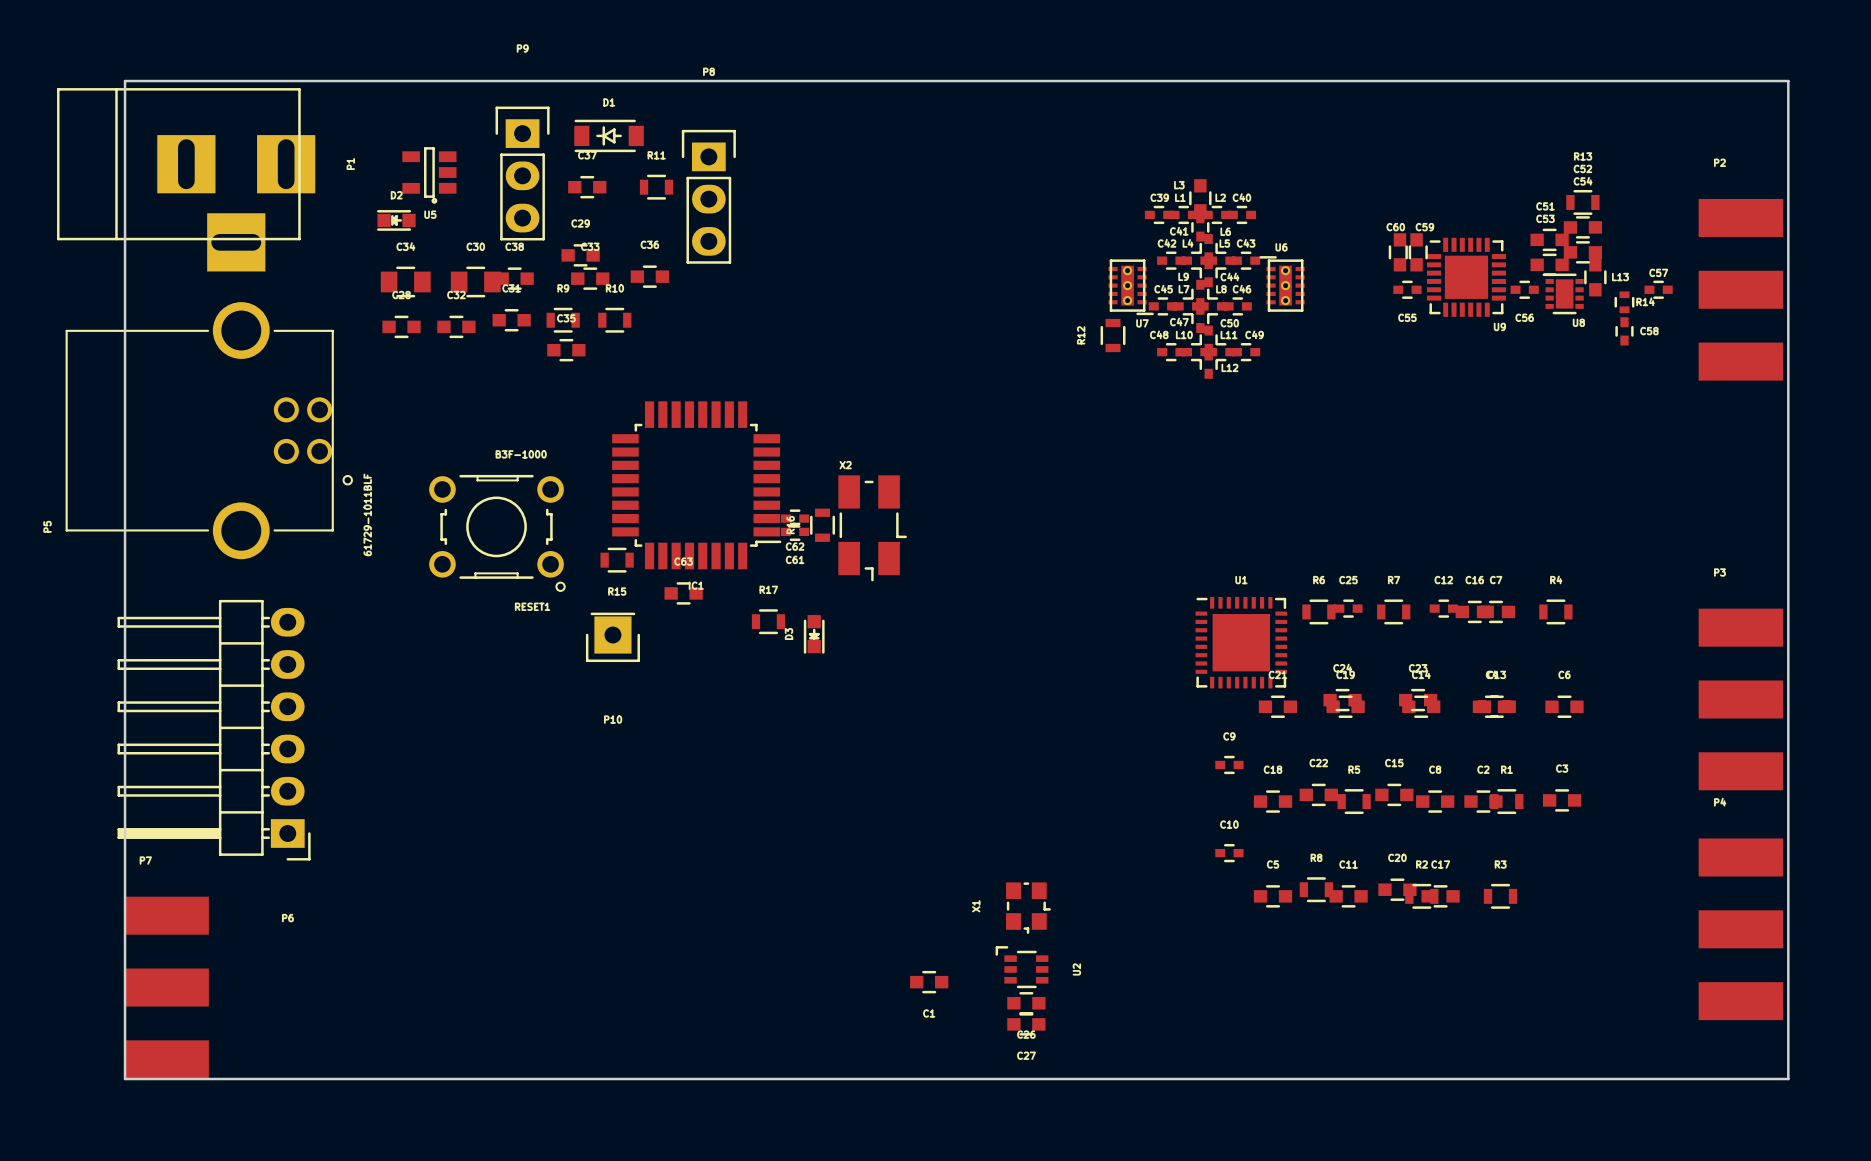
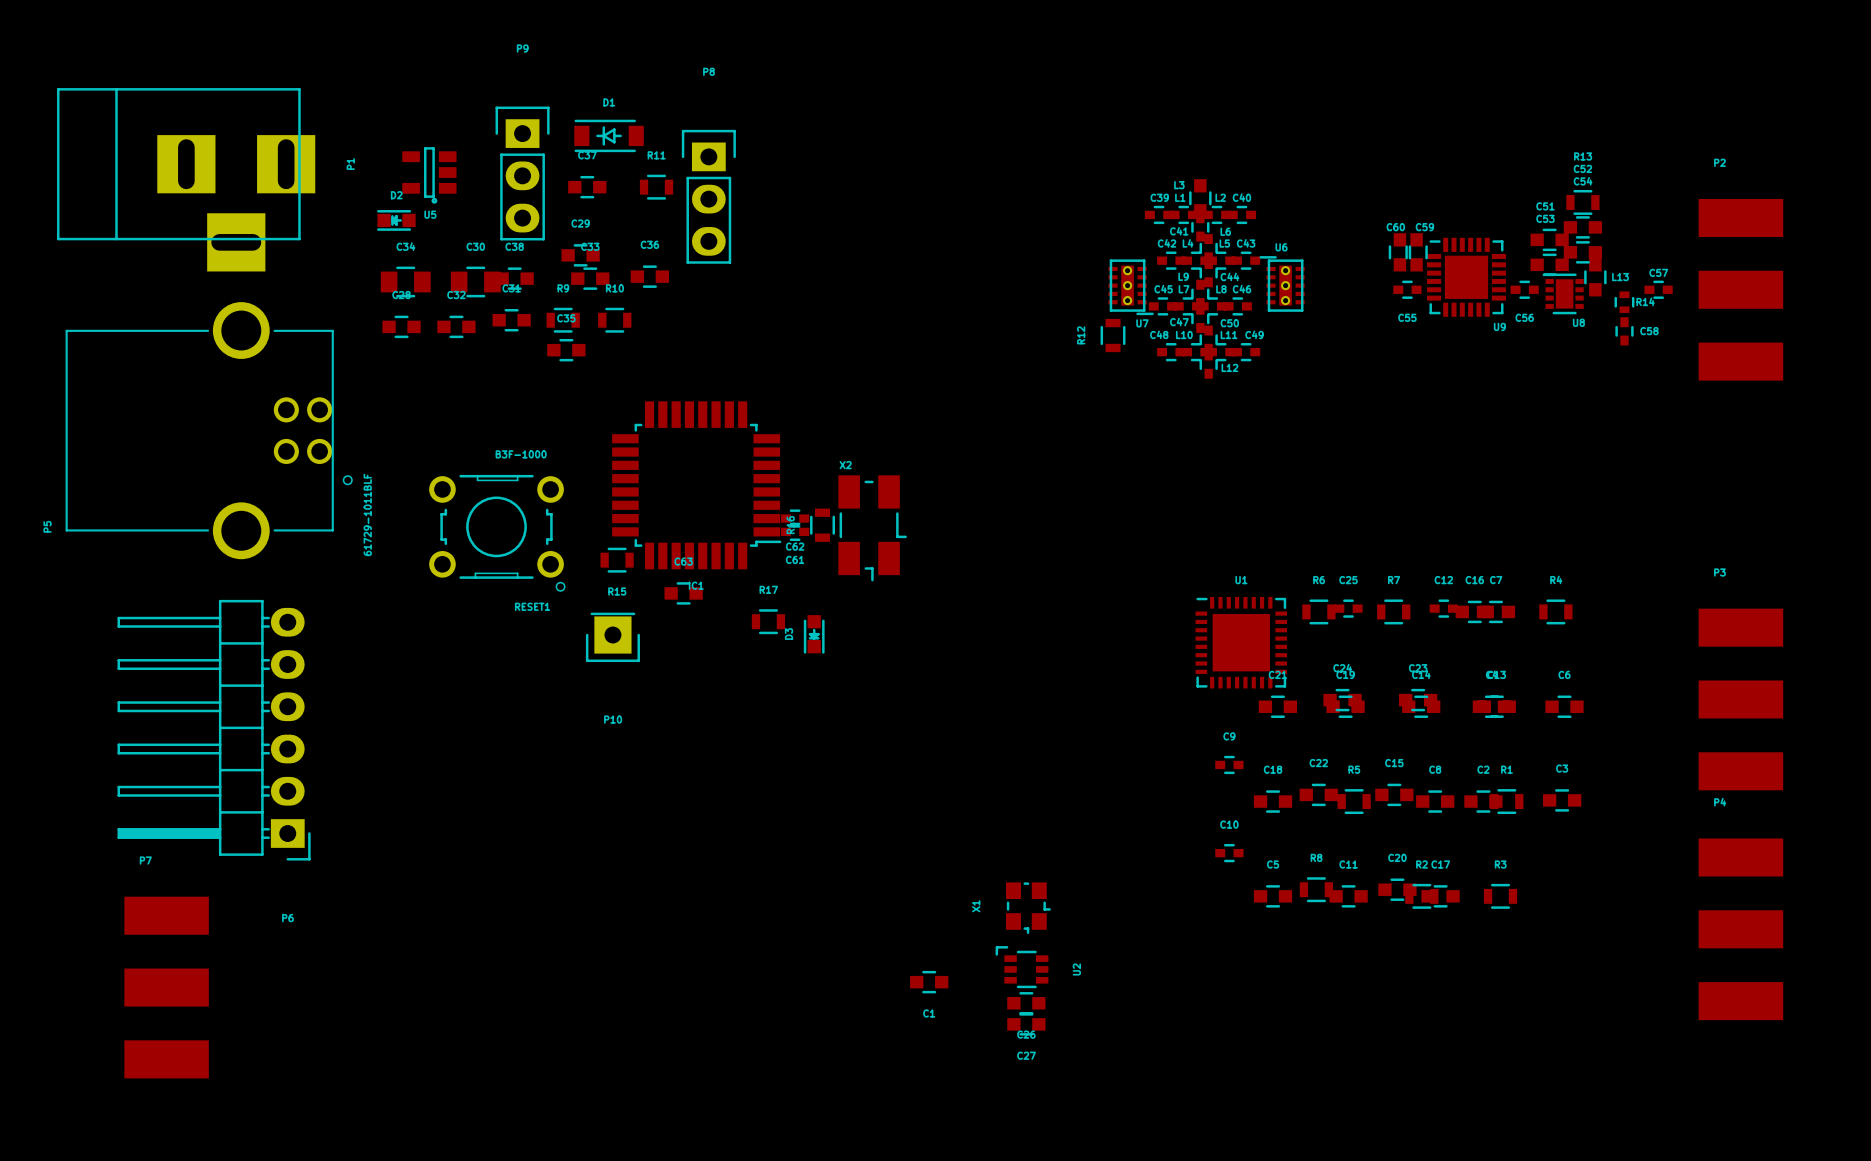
board edge: (125, 81) (125, 1079) (1788, 1079) (1788, 81) (125, 81) -> none

